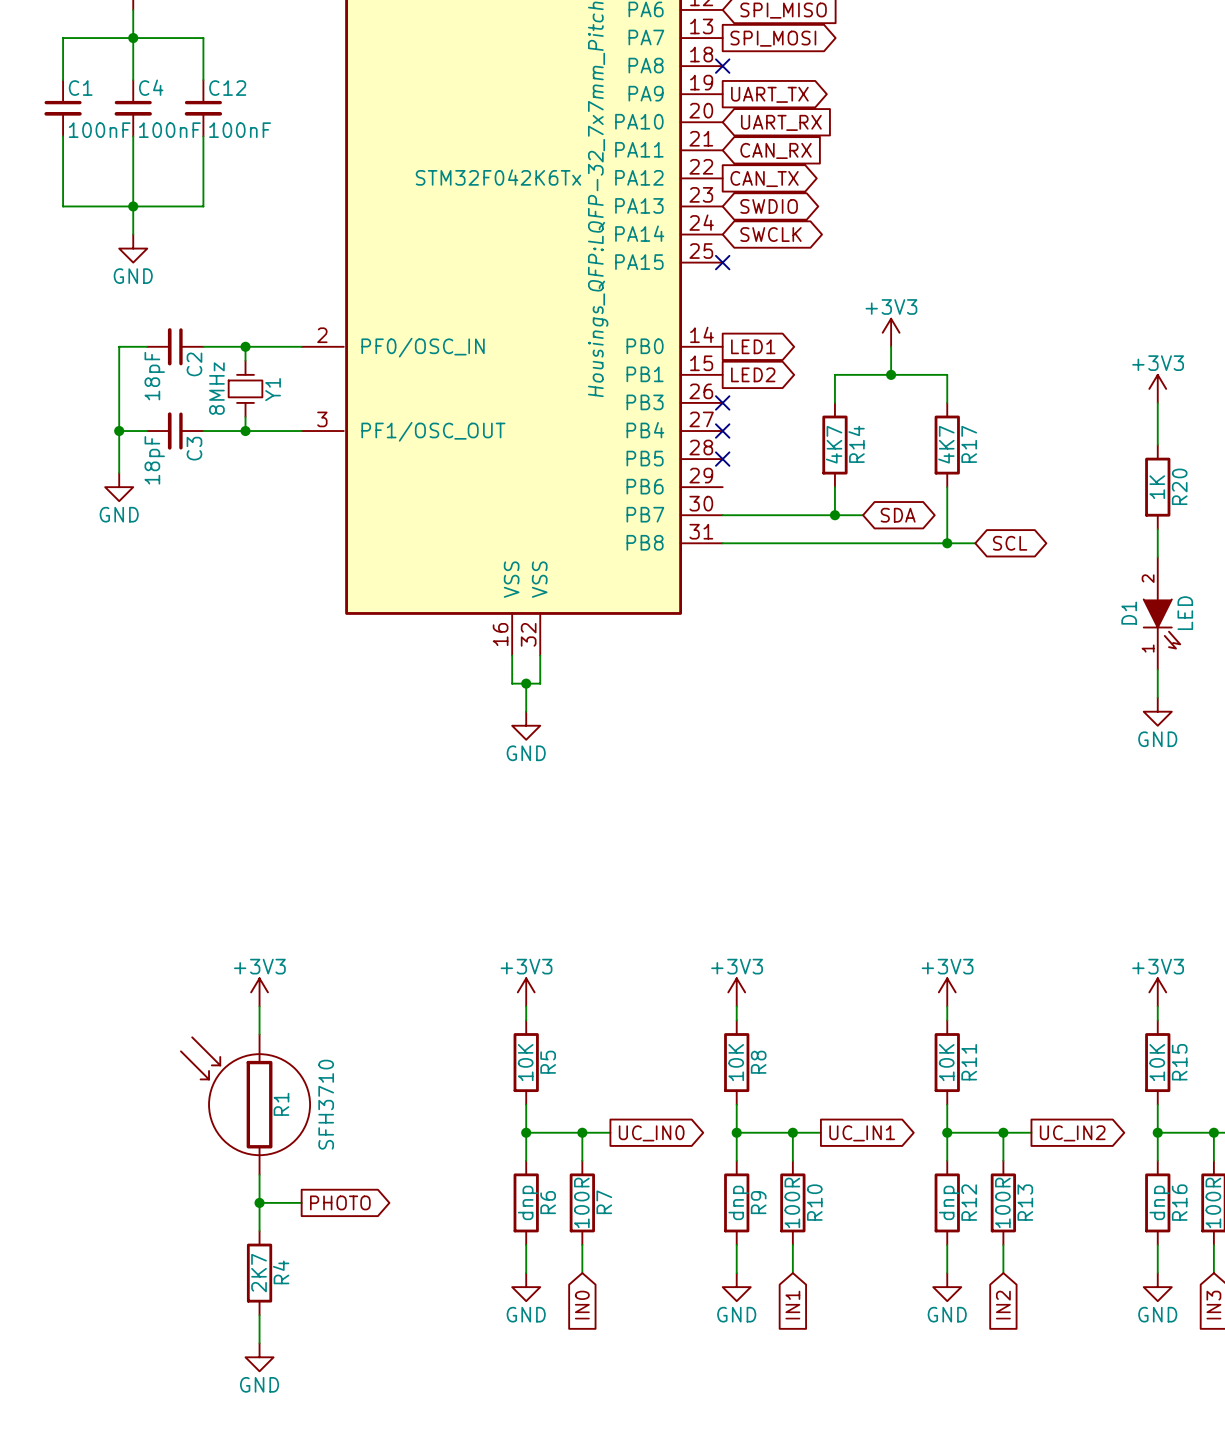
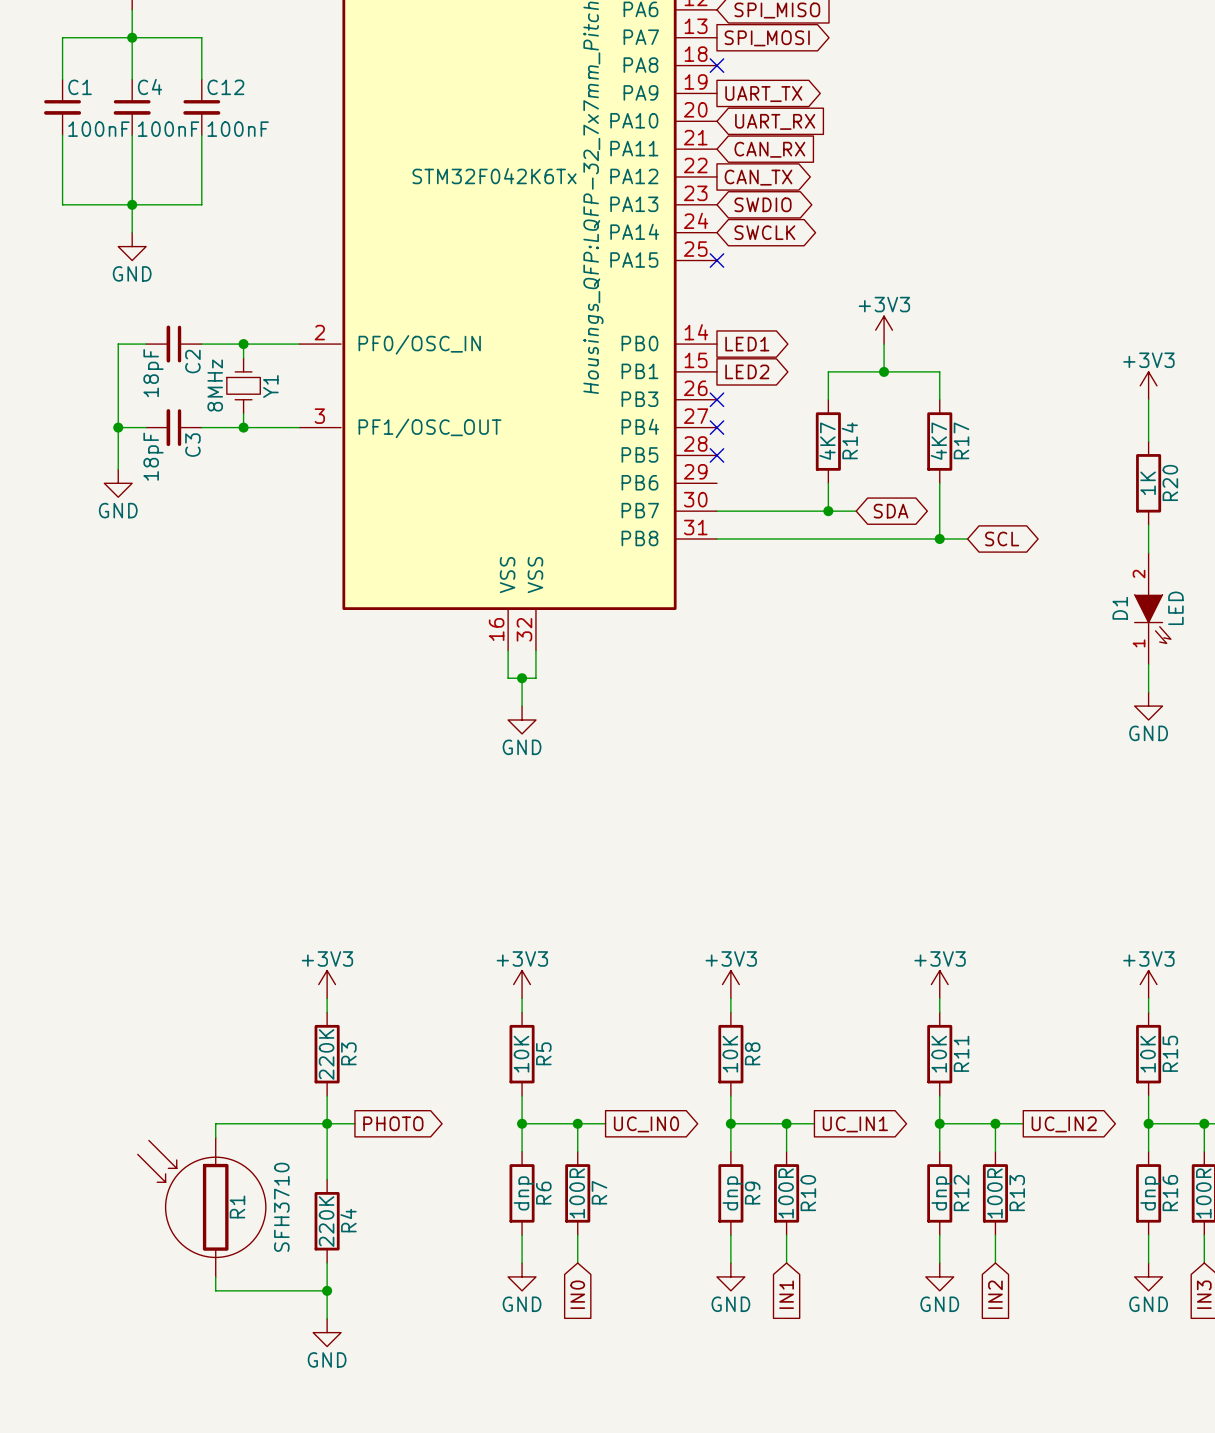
power symbol position: +3V3 (259, 992) -> +3V3 (327, 984)
wire: (259, 1006) (259, 1034) -> none
wire: none -> (327, 998) (327, 1012)
R3: none -> 220K (327, 1054)
R1 position: (245, 1104) -> (201, 1207)
wire: none -> (327, 1095) (327, 1179)
junction: none -> (327, 1123)
wire: none -> (354, 1123) (215, 1123) (215, 1137)
wire: (259, 1174) (259, 1230) -> (327, 1263) (327, 1318)
wire: (259, 1202) (301, 1202) -> none
junction: (259, 1202) -> none
global label position: PHOTO (340, 1202) -> PHOTO (393, 1123)
R4 position: (259, 1273) -> (327, 1221)
R4 value: 2K7 (259, 1273) -> 220K (326, 1221)
wire: none -> (215, 1276) (215, 1290) (327, 1290)
junction: none -> (327, 1290)
wire: (259, 1315) (259, 1343) -> none
power symbol position: GND (259, 1357) -> GND (327, 1332)

